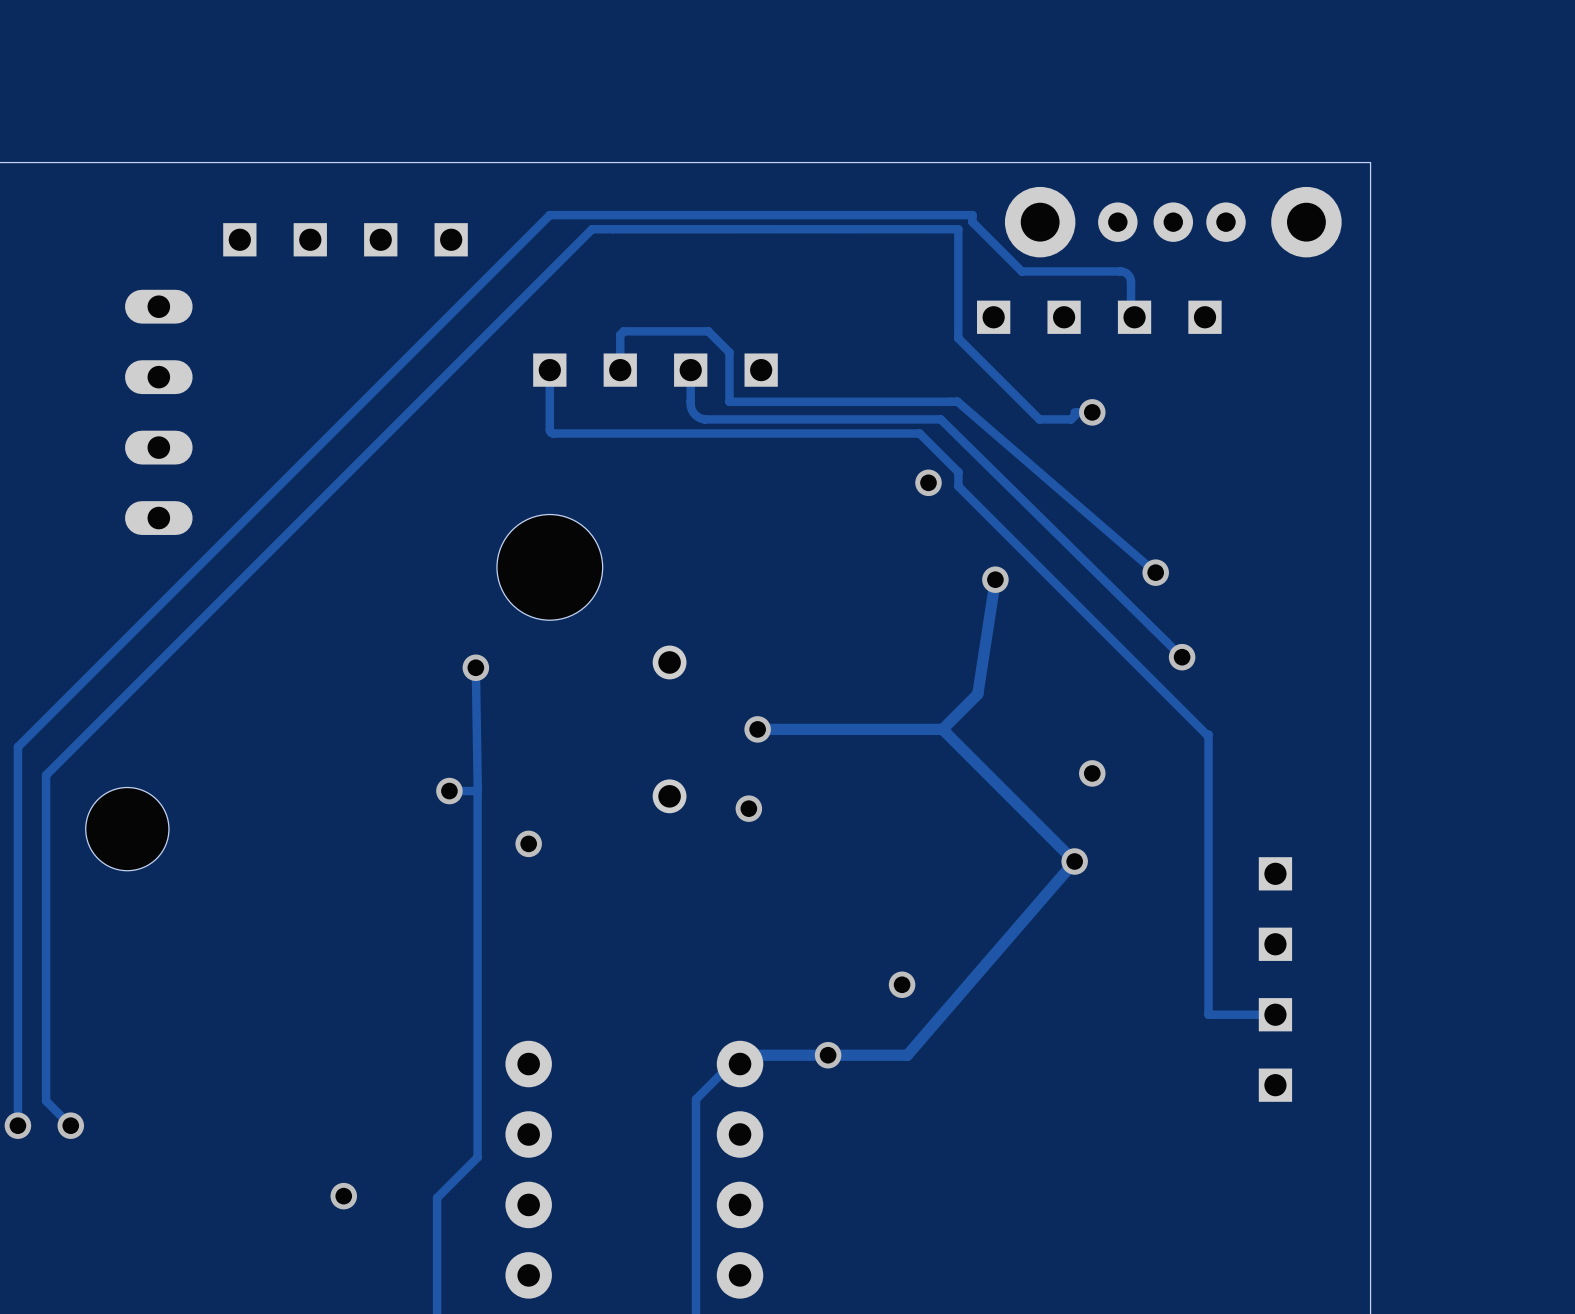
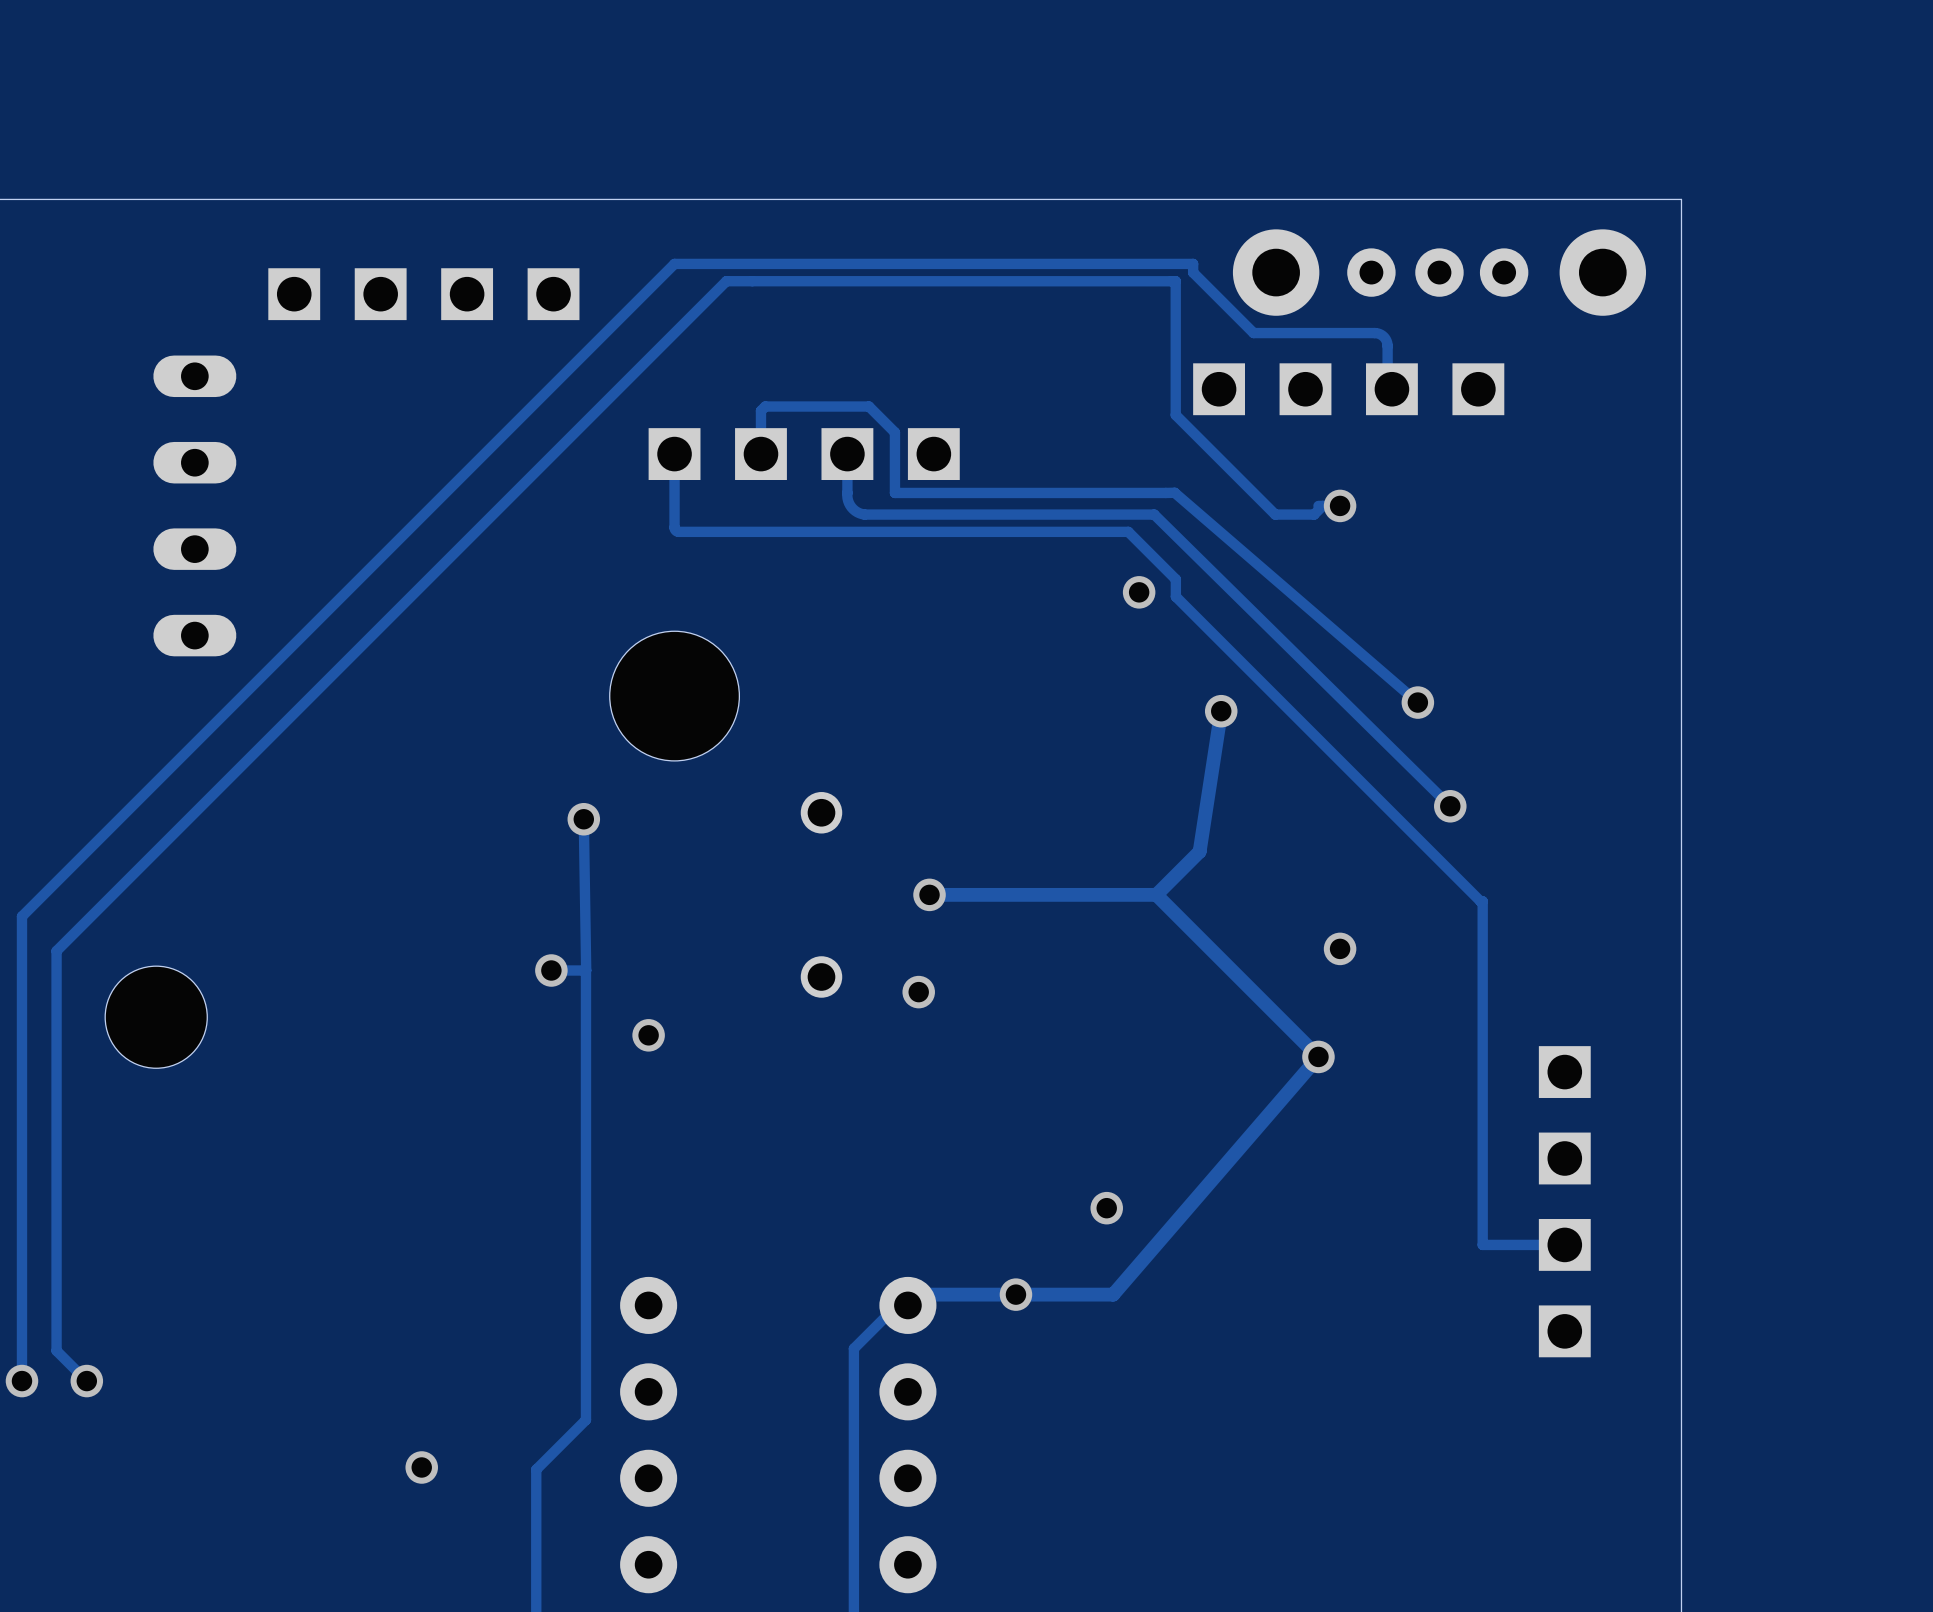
part footprint: [223, 223, 468, 257] -> [268, 268, 580, 321]
part footprint: [977, 300, 1222, 334] -> [1193, 363, 1505, 416]
part footprint: [533, 353, 778, 387] -> [648, 428, 960, 481]
part footprint: [1258, 857, 1293, 1102] -> [1538, 1046, 1591, 1358]

